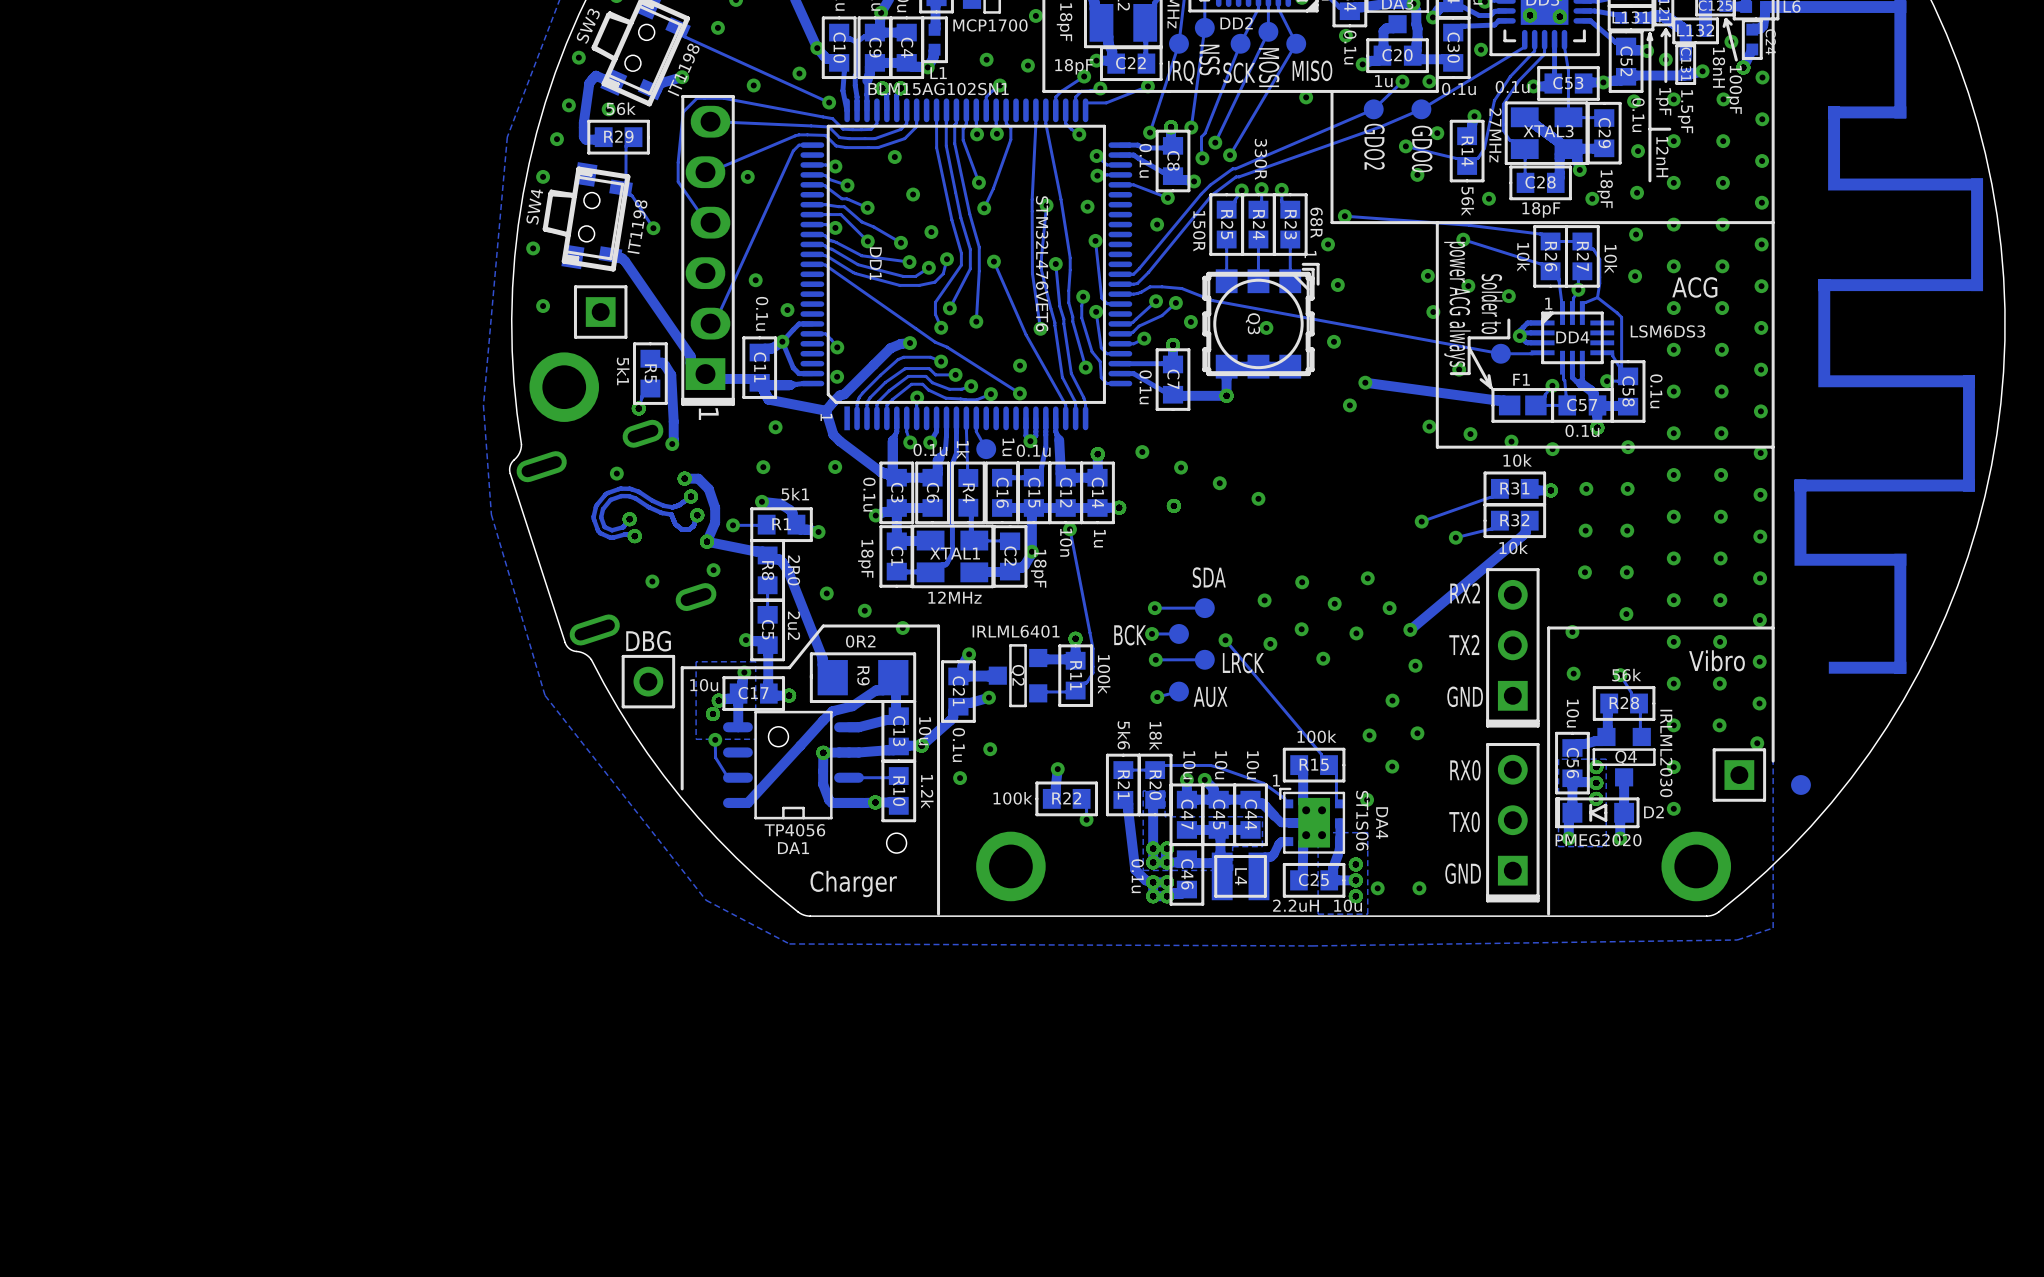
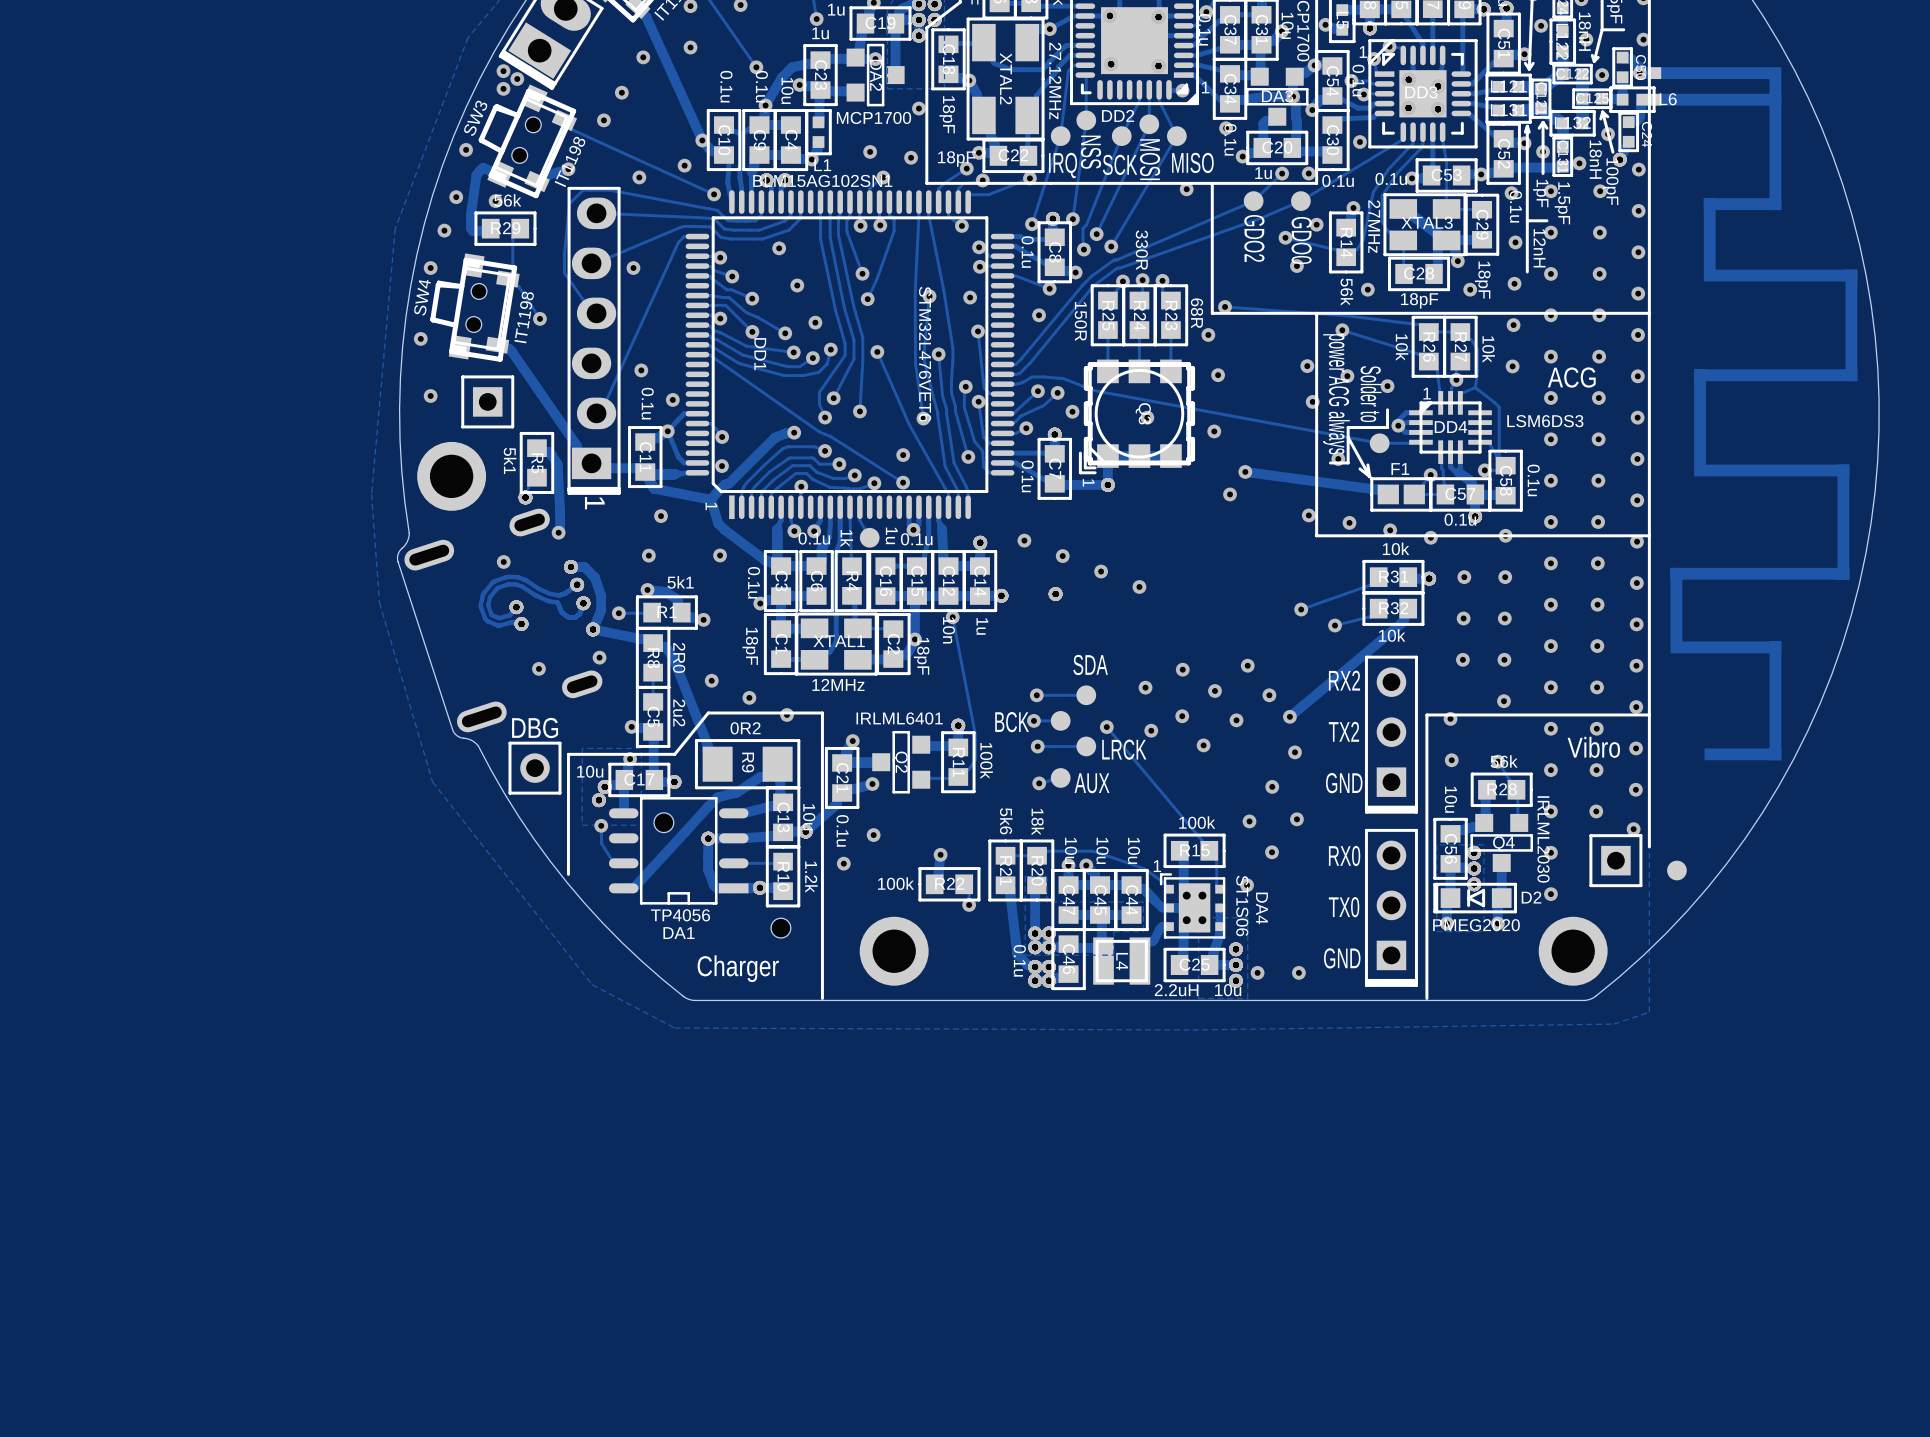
Q3 rotation: 0° (1263, 320) -> 180° (1134, 416)

